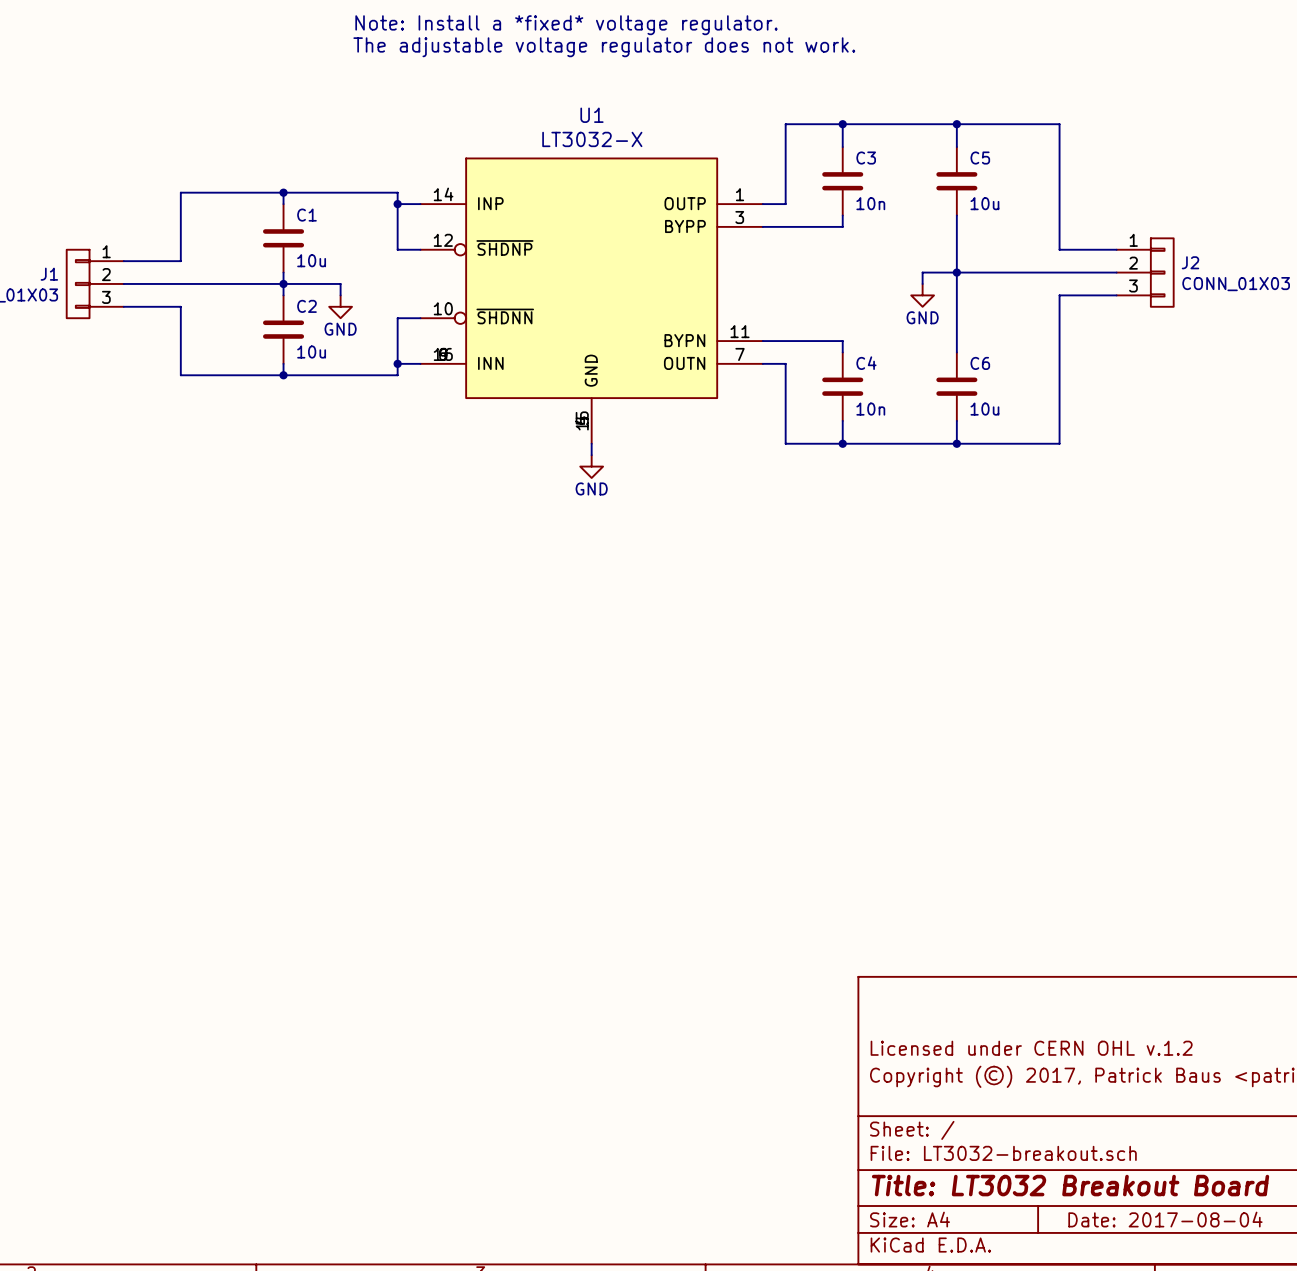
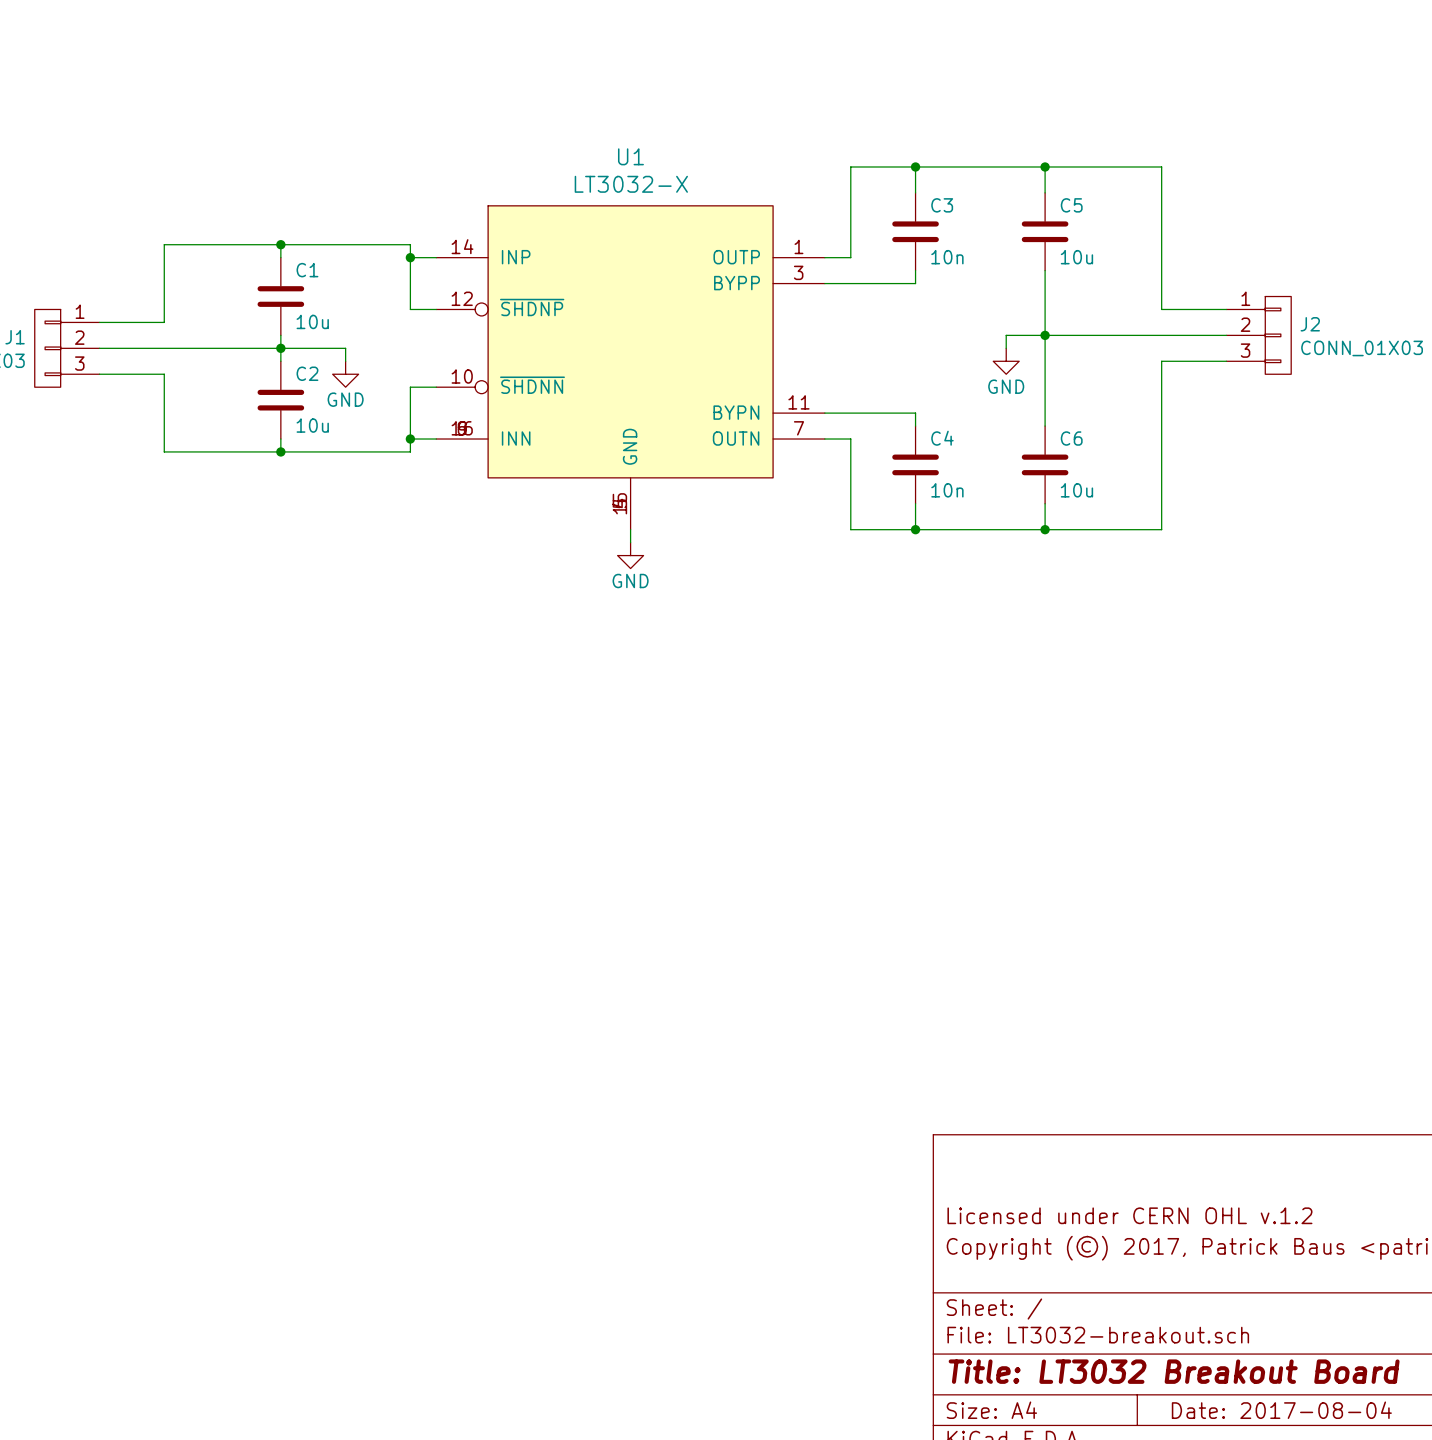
text: Note: Install a *fixed* voltage regulator. (566, 25) -> none
text: The adjustable voltage regulator does not work. (604, 47) -> none

